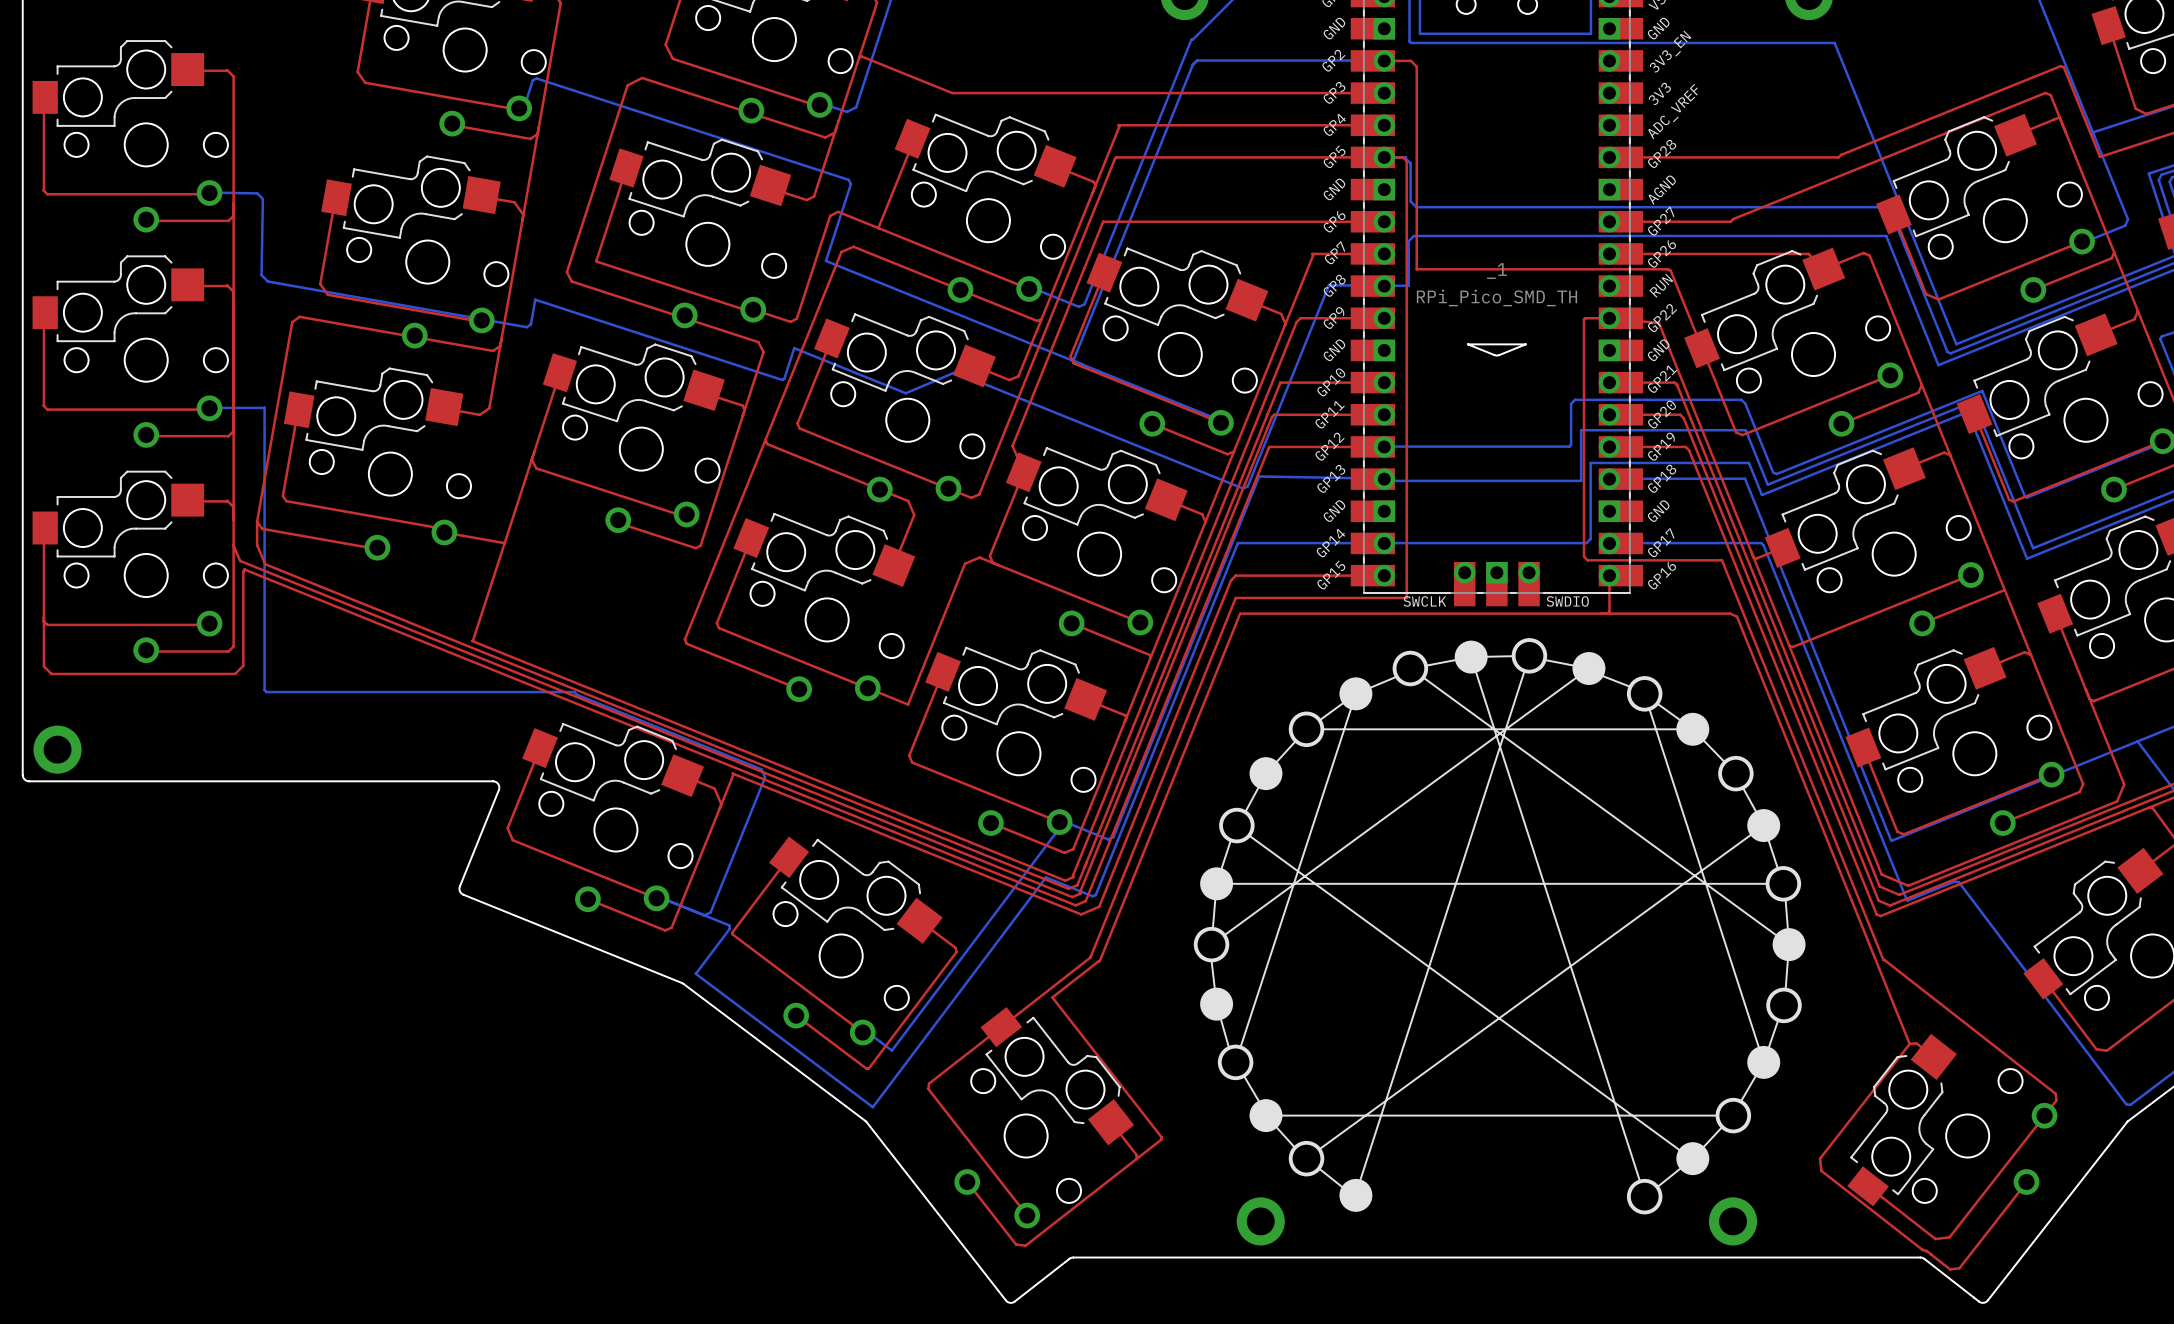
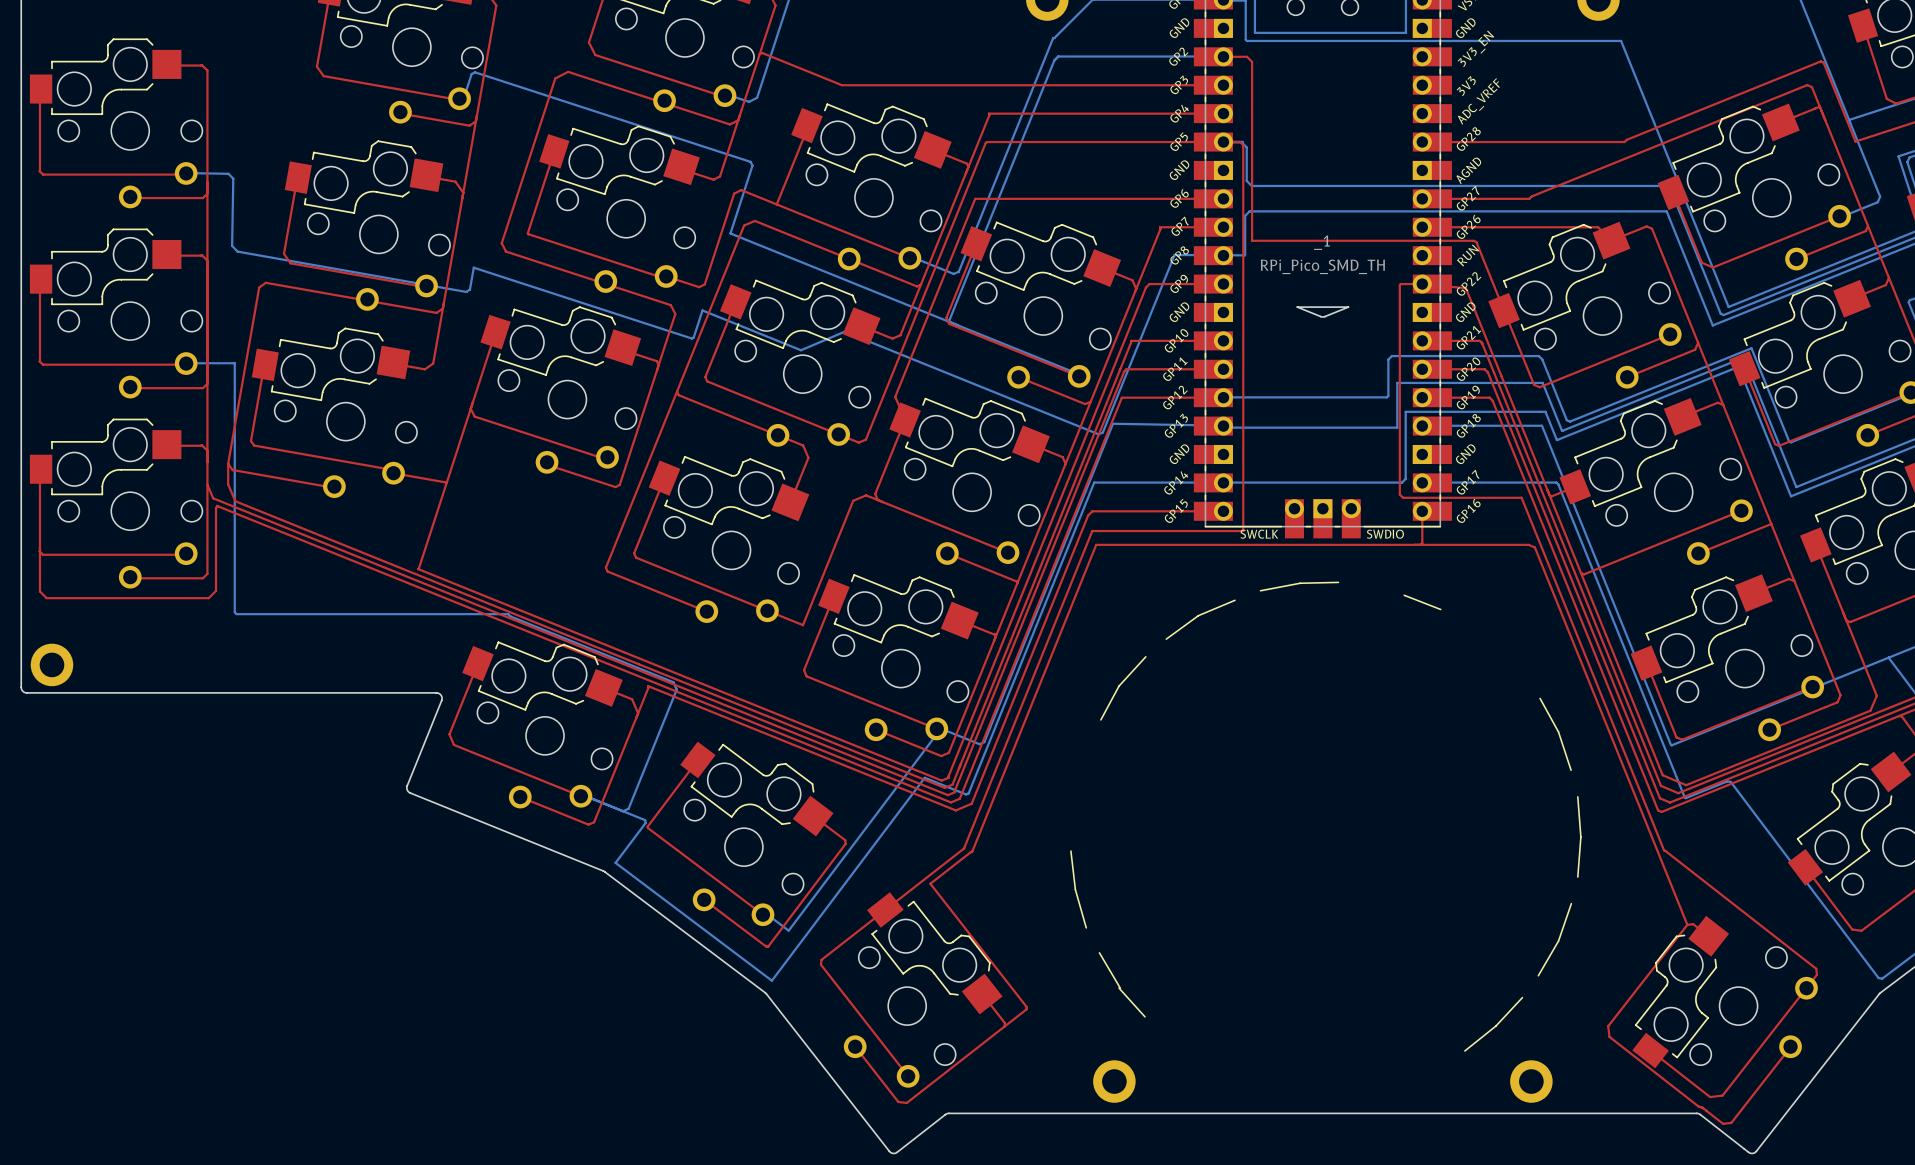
drawing: [1511, 638, 1548, 674] -> none
drawing: [1454, 640, 1488, 674] -> none
drawing: [1392, 650, 1429, 687] -> none
drawing: [1572, 652, 1606, 685] -> none
line: (1471, 657) (1639, 1181) -> none
line: (1544, 659) (1588, 668) (1224, 935) -> none
line: (1524, 670) (1356, 1192) -> none
drawing: [1626, 676, 1754, 792] -> none
drawing: [1339, 677, 1373, 711] -> none
line: (1423, 677) (1789, 944) -> none
line: (1356, 693) (1240, 1047) -> none
line: (1657, 703) (1692, 729) (1724, 762) -> none
line: (1649, 708) (1763, 1062) -> none
drawing: [1249, 711, 1325, 791] -> none
line: (1322, 729) (1676, 729) -> none
drawing: [1219, 807, 1255, 844] -> none
drawing: [1747, 809, 1781, 843] -> none
line: (1763, 825) (1319, 1149) -> none
line: (1248, 835) (1692, 1159) -> none
line: (1230, 841) (1216, 883) (1212, 928) -> none
drawing: [1765, 866, 1802, 902] -> none
drawing: [1200, 867, 1234, 901] -> none
line: (1232, 883) (1767, 883) -> none
drawing: [1193, 926, 1230, 963] -> none
drawing: [1772, 928, 1806, 962] -> none
drawing: [1200, 987, 1234, 1021] -> none
drawing: [1766, 987, 1802, 1024] -> none
drawing: [1217, 1044, 1254, 1081] -> none
drawing: [1747, 1045, 1781, 1079] -> none
drawing: [1626, 1097, 1752, 1215] -> none
drawing: [1249, 1099, 1325, 1177] -> none
line: (1281, 1115) (1717, 1115) -> none
line: (1318, 1168) (1352, 1195) -> none
drawing: [1339, 1178, 1373, 1212] -> none

